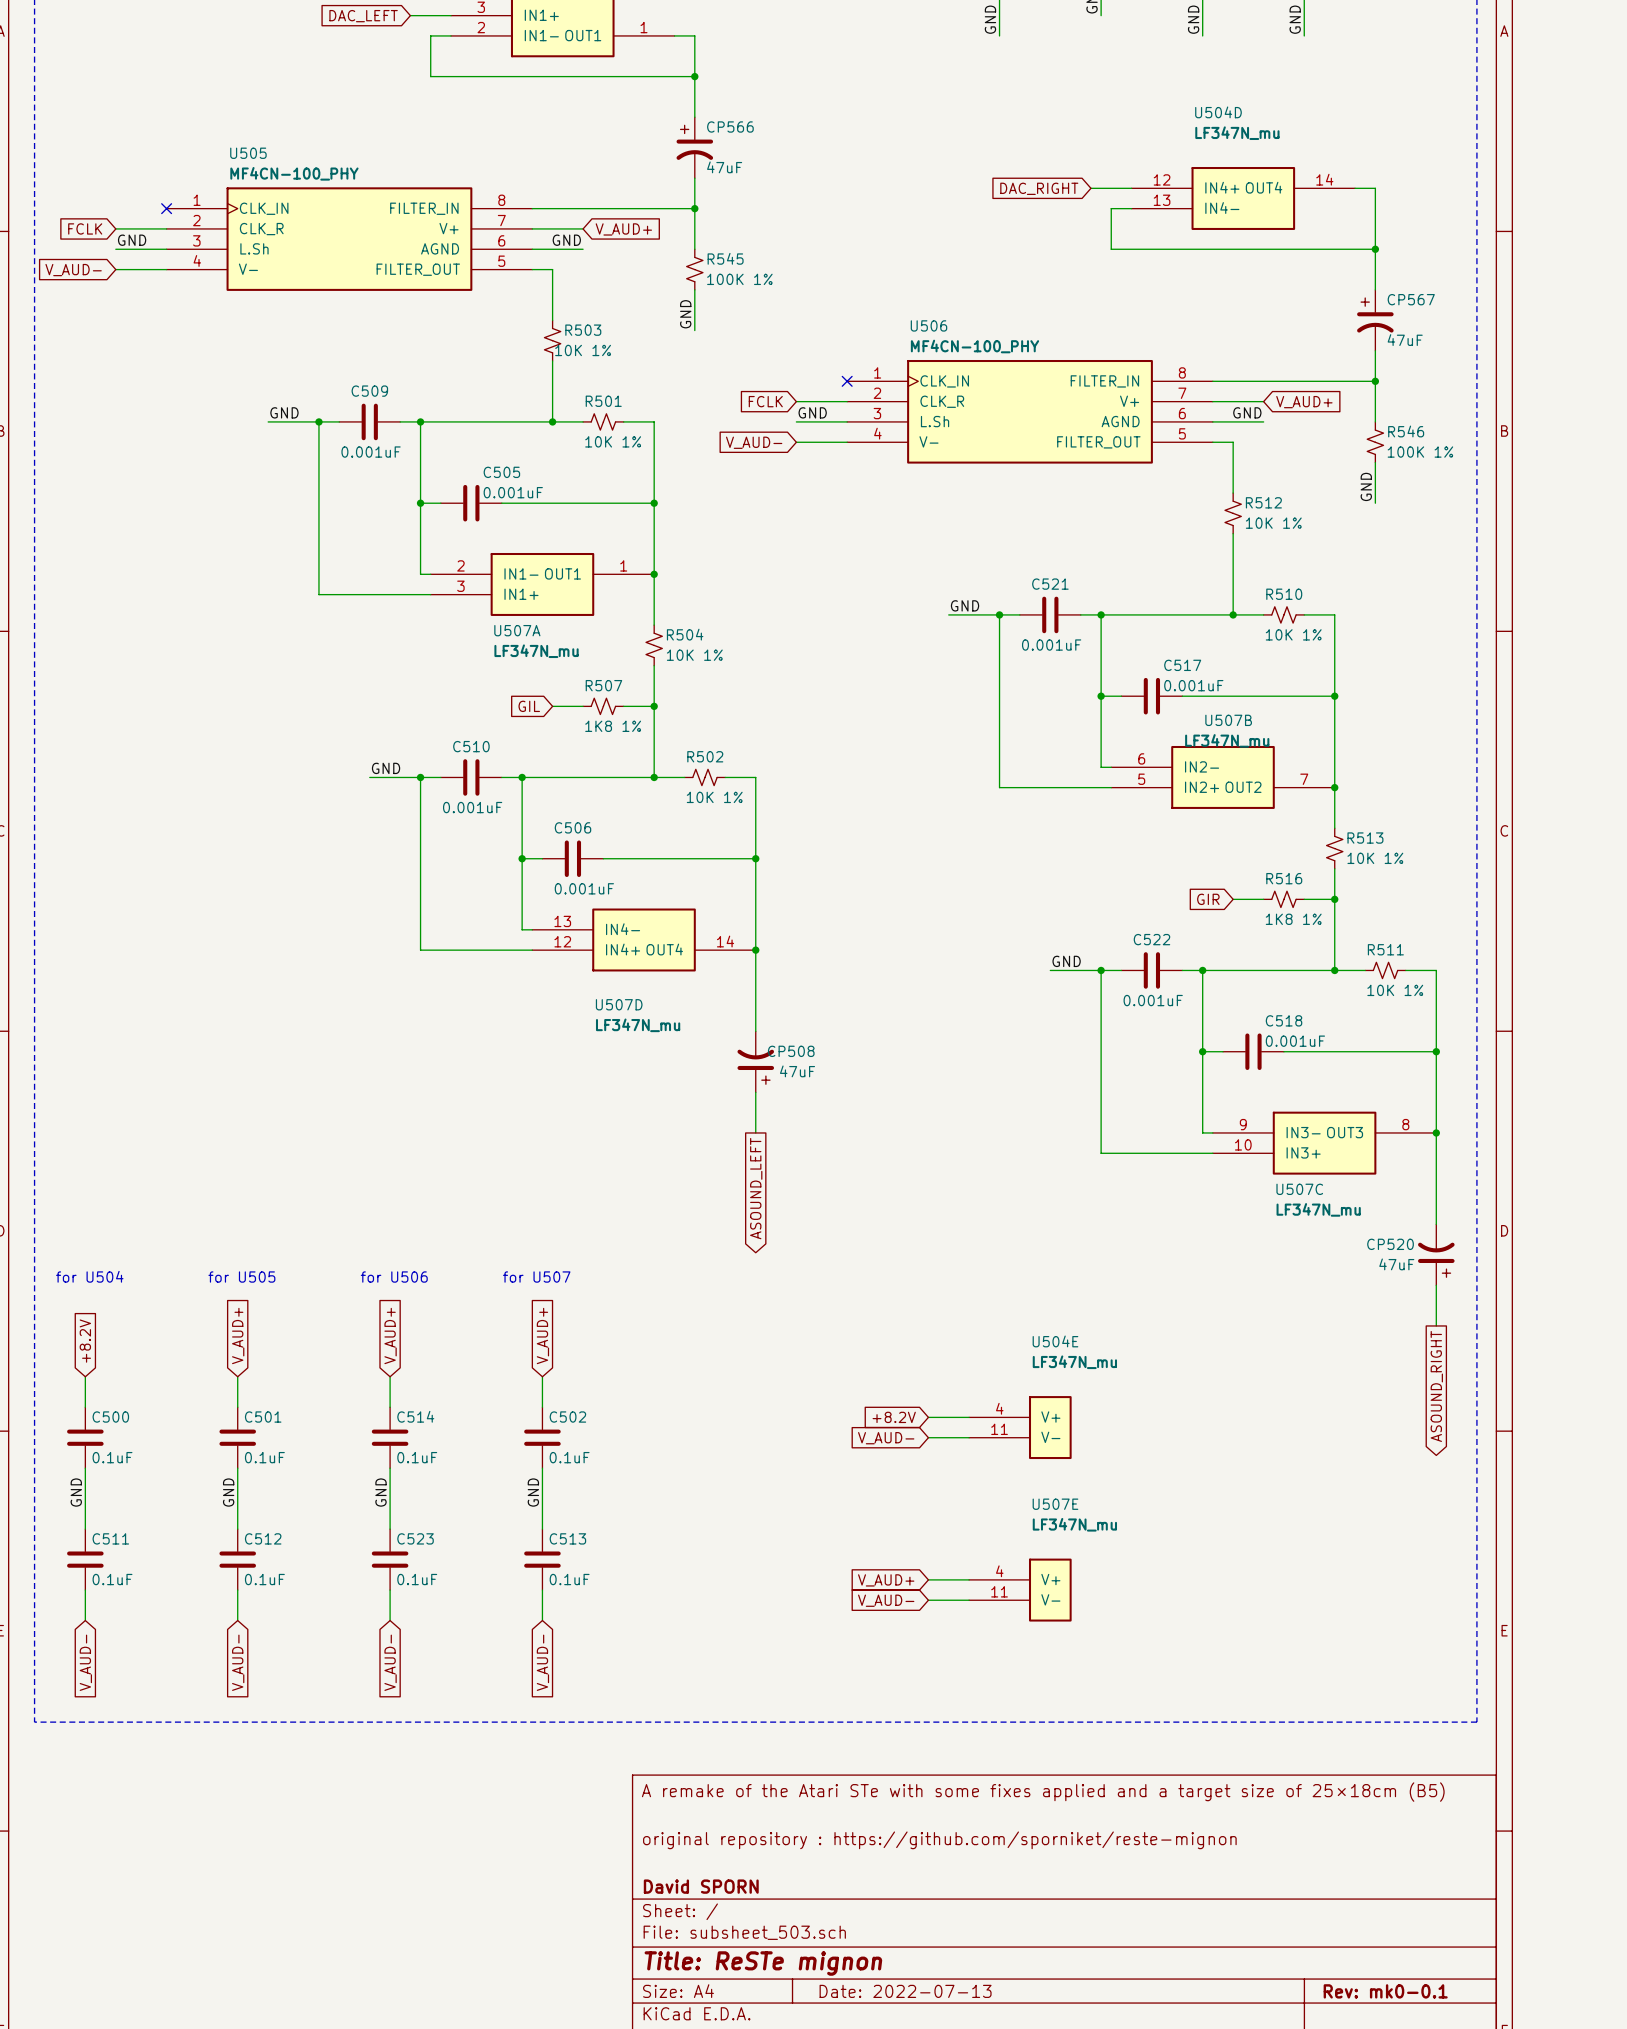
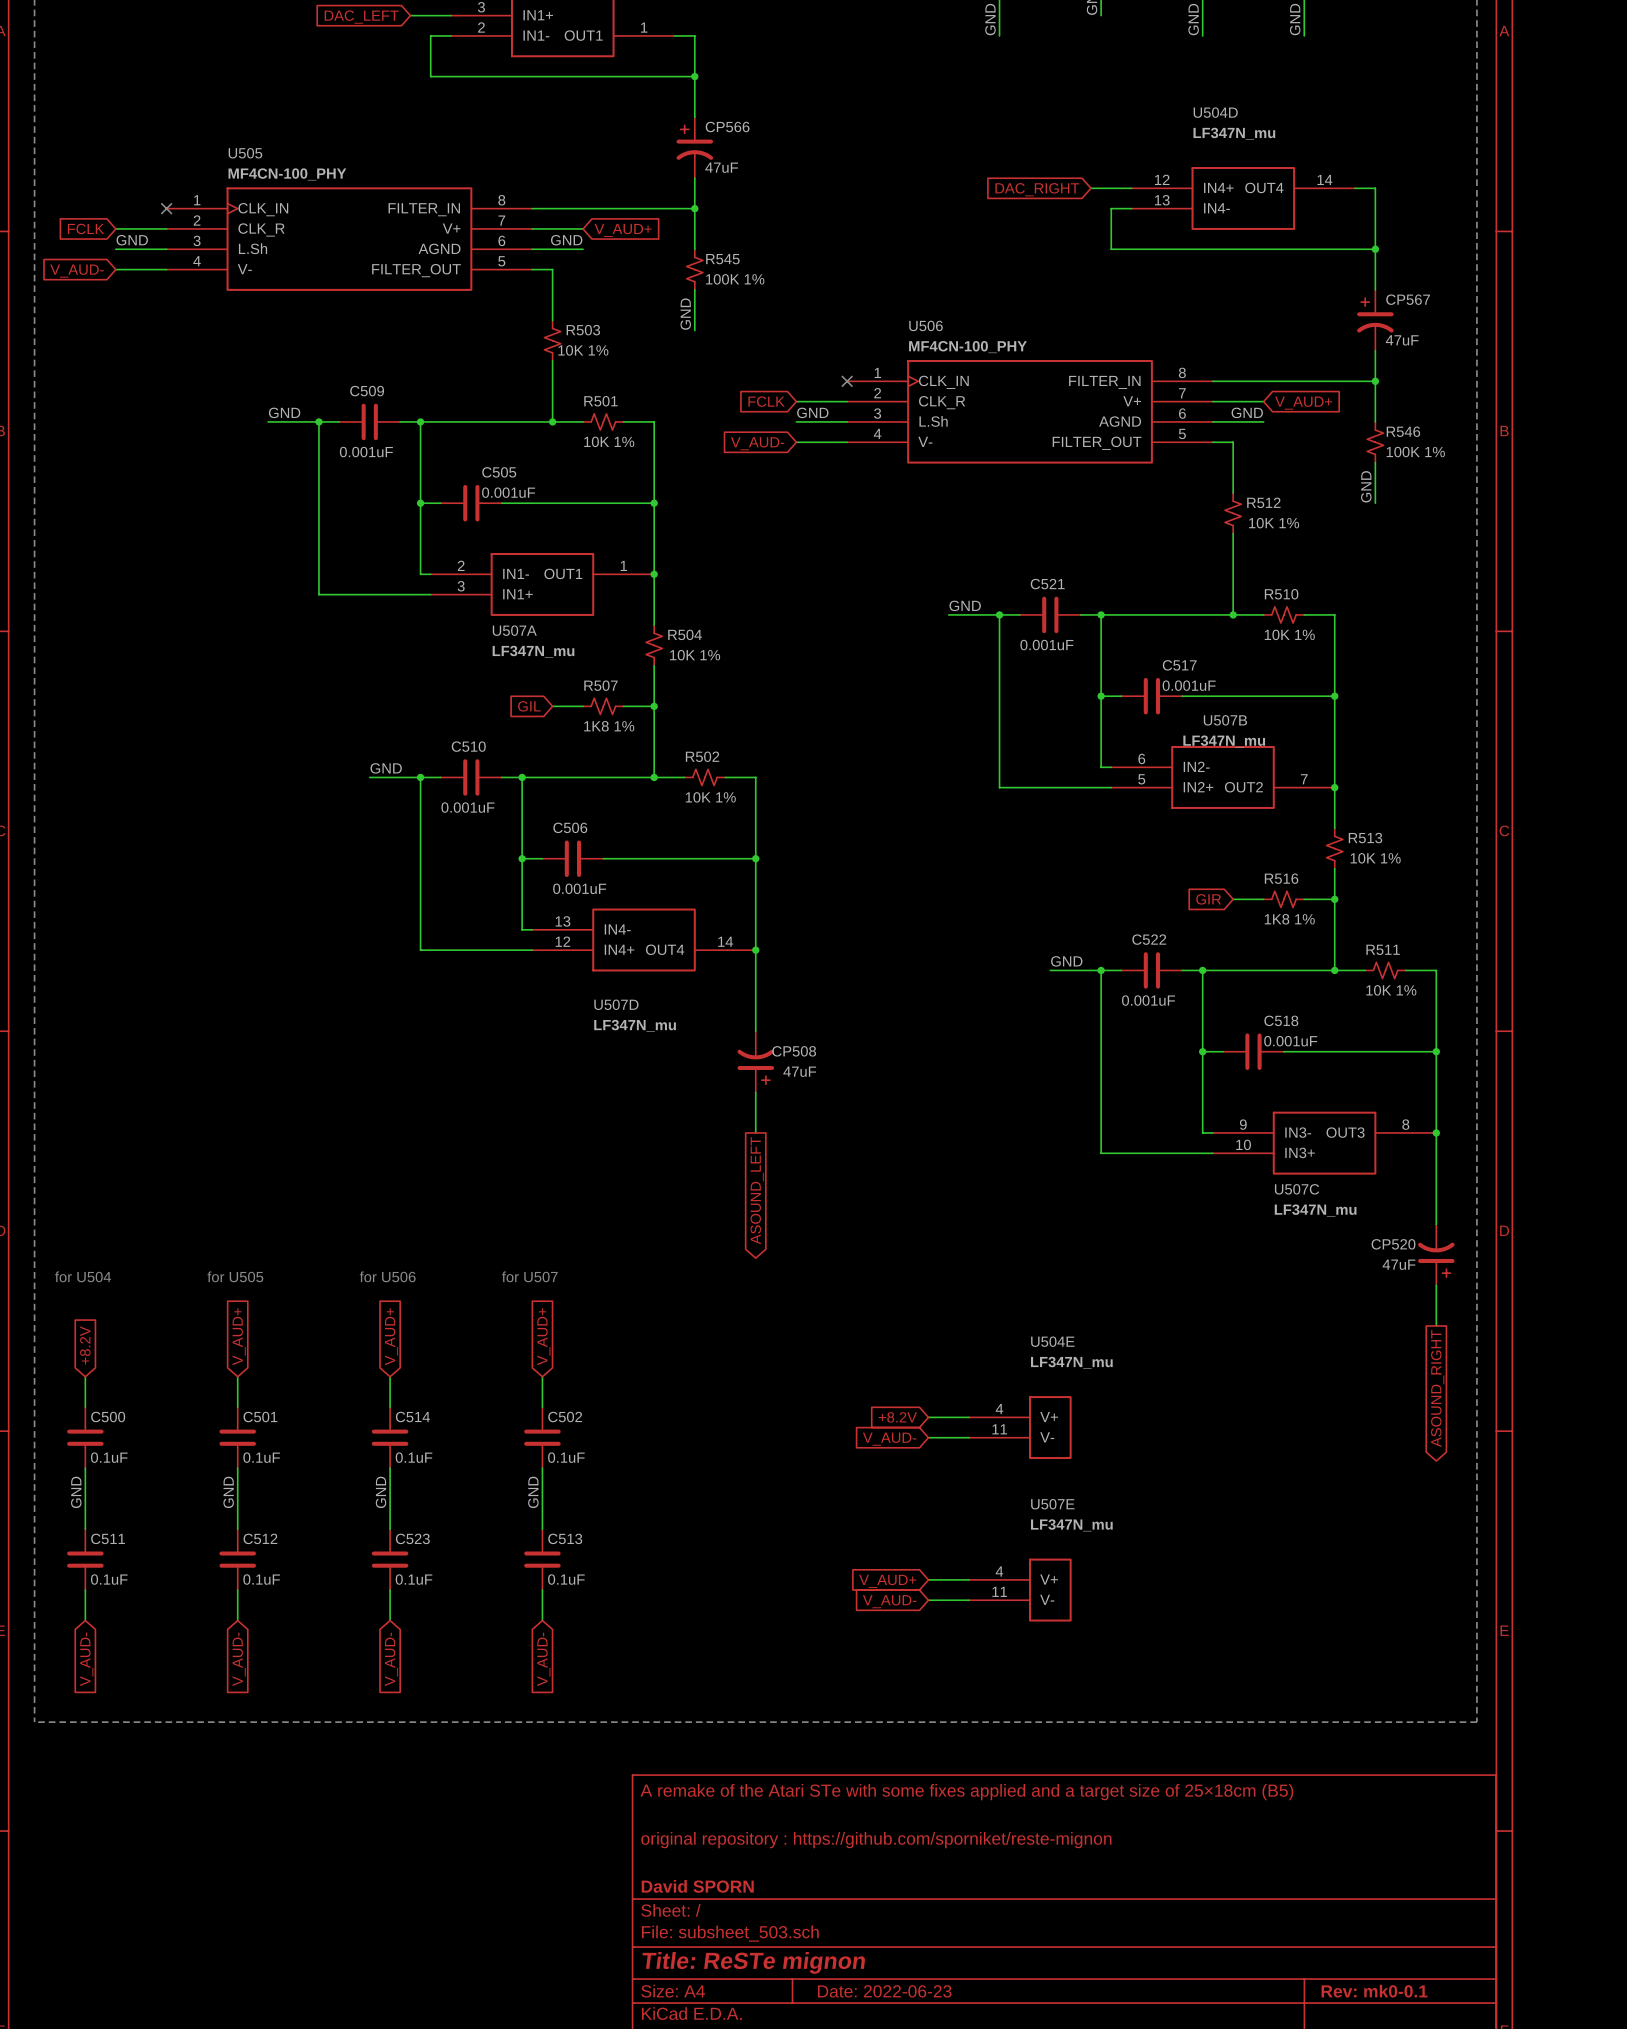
title block: Date: 2022-07-13 (905, 1991) -> Date: 2022-06-23 (884, 1991)

